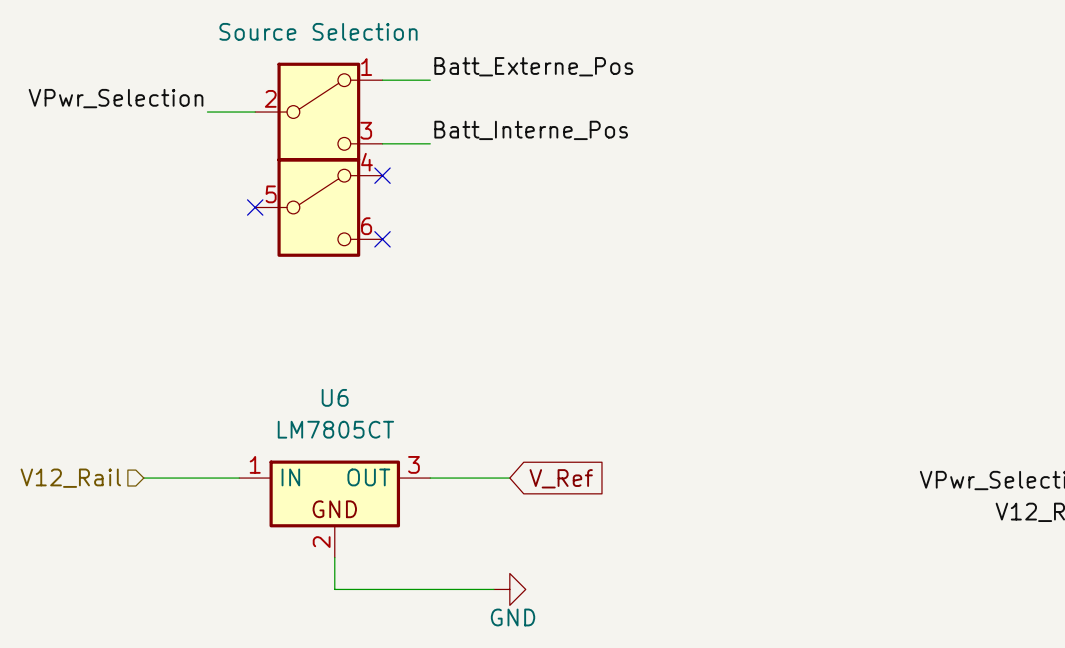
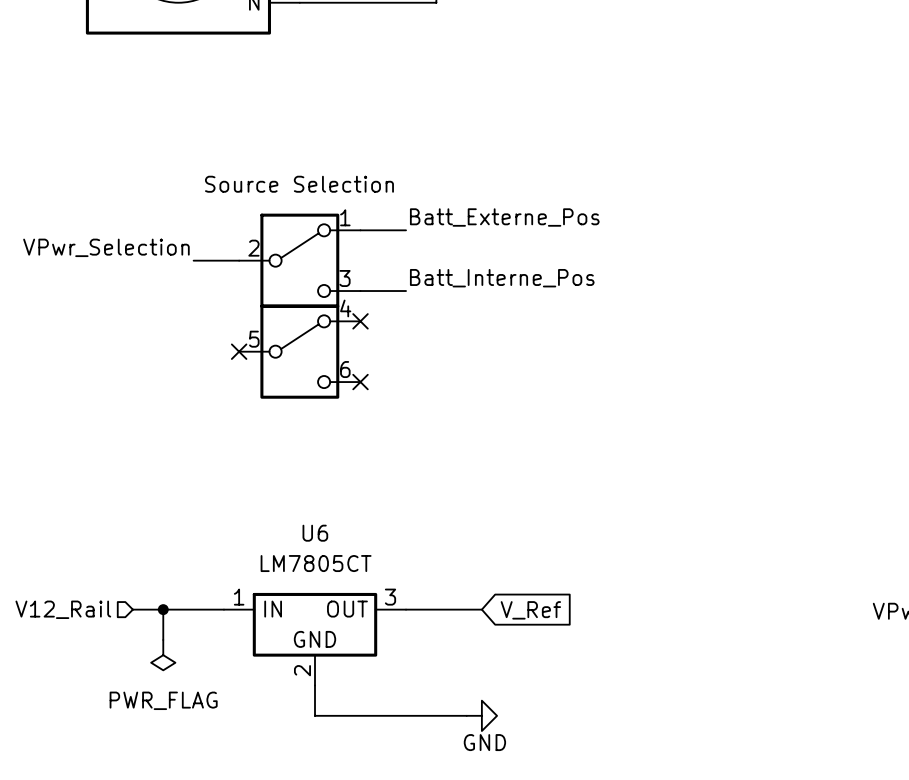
wire: none -> (163, 609) (163, 639)
junction: none -> (163, 609)
power symbol: none -> PWR_FLAG (163, 655)

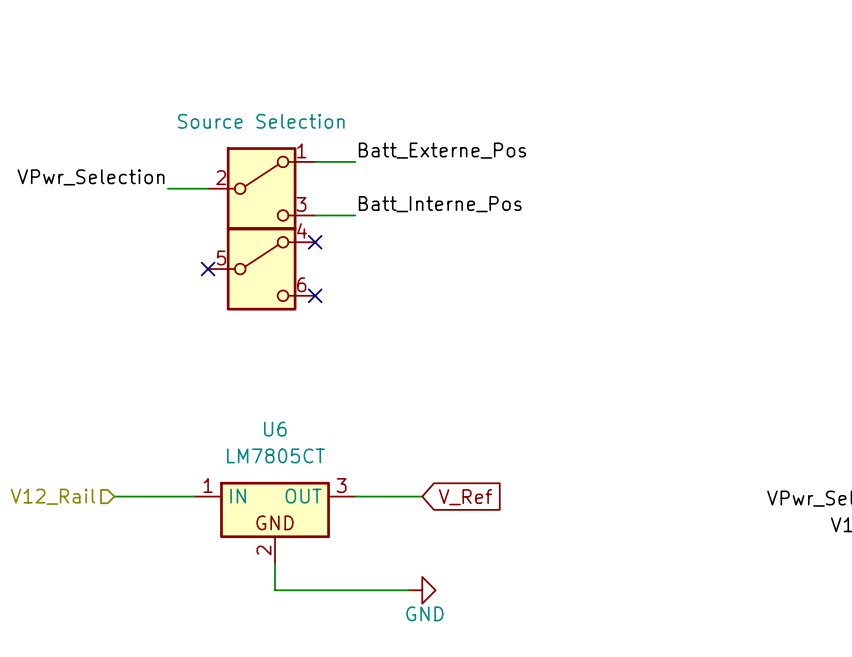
wire: (163, 609) (163, 639) -> none
junction: (163, 609) -> none
power symbol: PWR_FLAG (163, 655) -> none

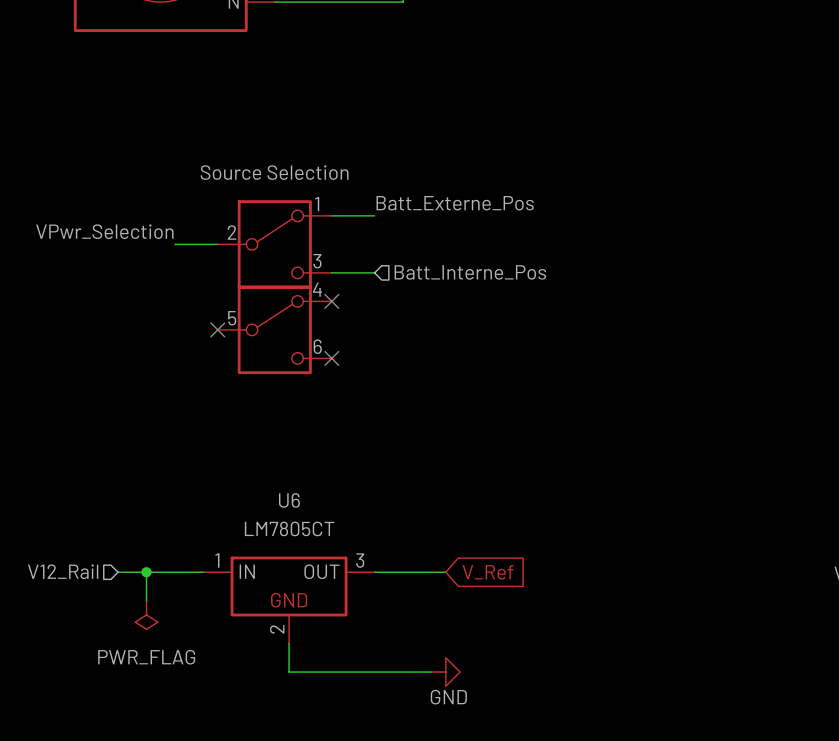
label: Batt_Interne_Pos (440, 204) -> none
hierarchical label: none -> Batt_Interne_Pos (470, 272)
wire: none -> (146, 572) (146, 600)
junction: none -> (146, 572)
power symbol: none -> PWR_FLAG (146, 615)

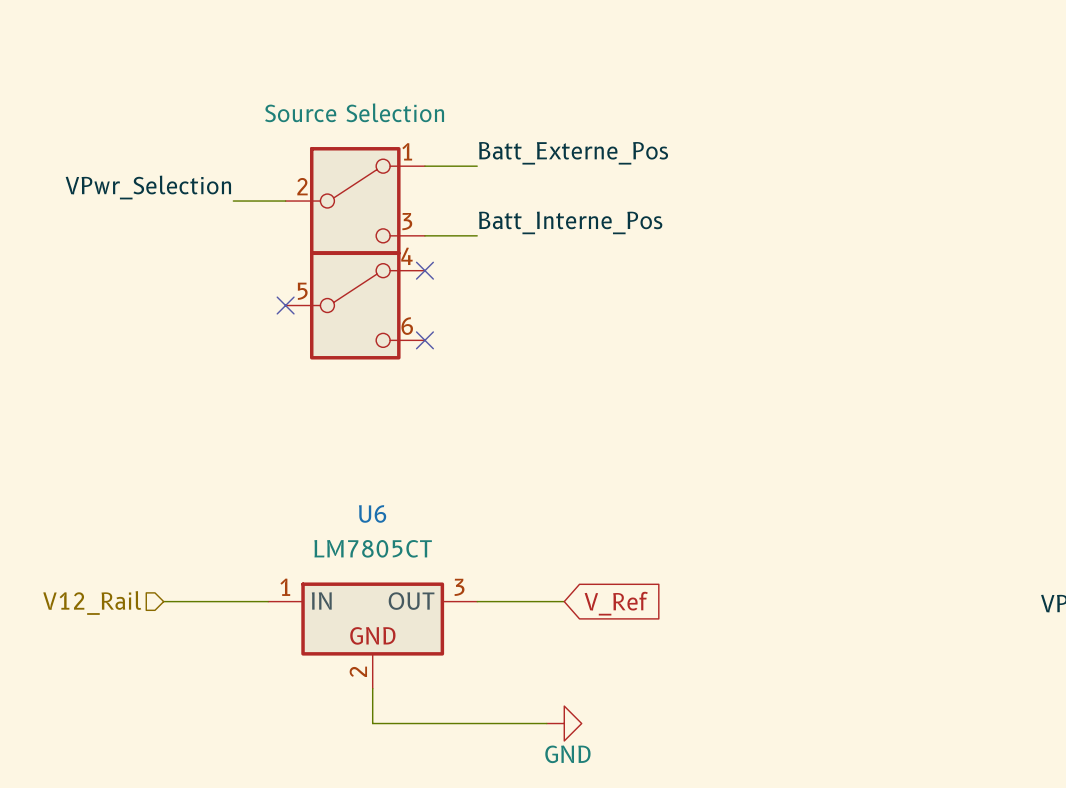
label: none -> Batt_Interne_Pos (570, 222)
hierarchical label: Batt_Interne_Pos (470, 272) -> none
wire: (146, 572) (146, 600) -> none
junction: (146, 572) -> none
power symbol: PWR_FLAG (146, 615) -> none

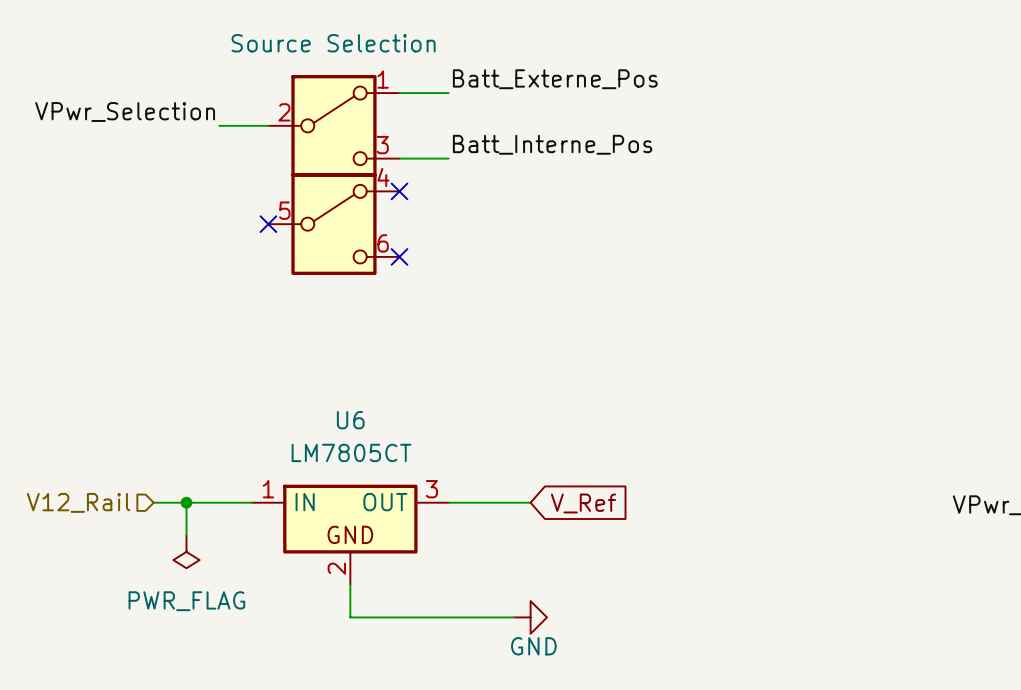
wire: none -> (186, 502) (186, 535)
junction: none -> (186, 502)
power symbol: none -> PWR_FLAG (186, 551)

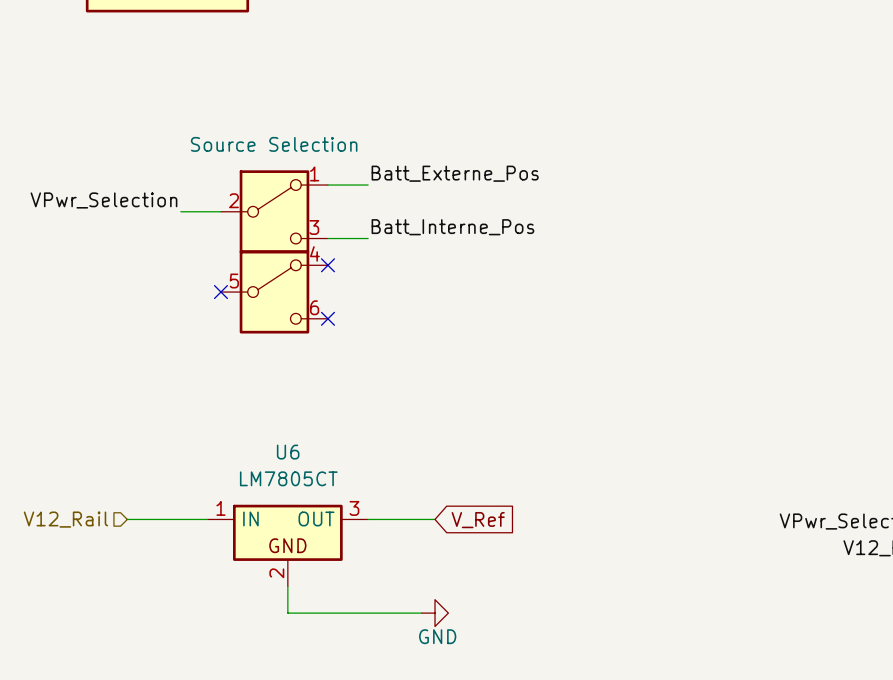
wire: (186, 502) (186, 535) -> none
junction: (186, 502) -> none
power symbol: PWR_FLAG (186, 551) -> none

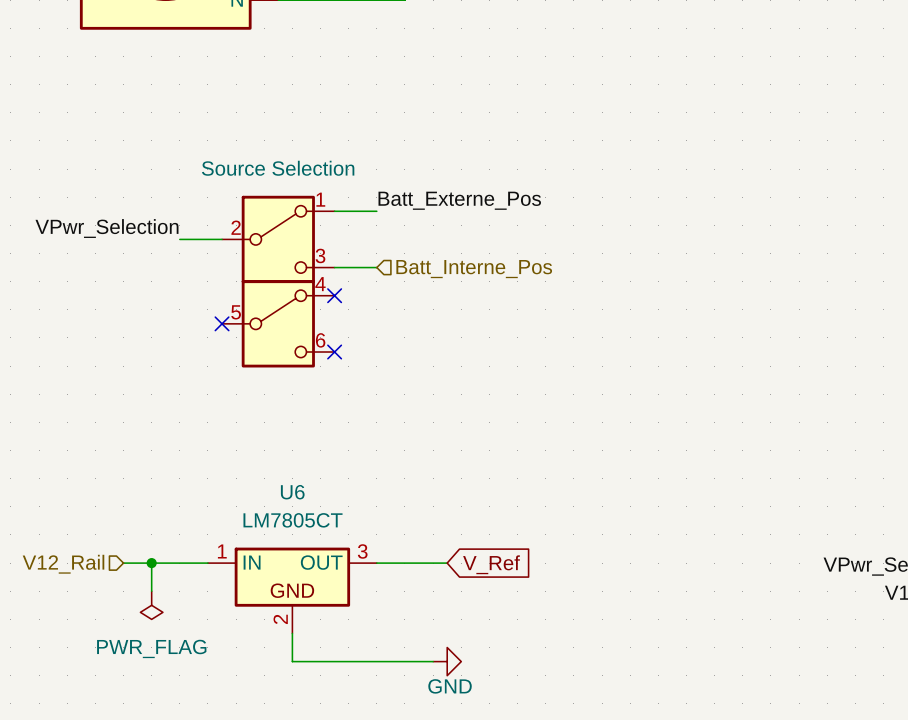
label: Batt_Interne_Pos (452, 227) -> none
hierarchical label: none -> Batt_Interne_Pos (474, 269)
wire: none -> (151, 563) (151, 591)
junction: none -> (151, 563)
power symbol: none -> PWR_FLAG (151, 605)

